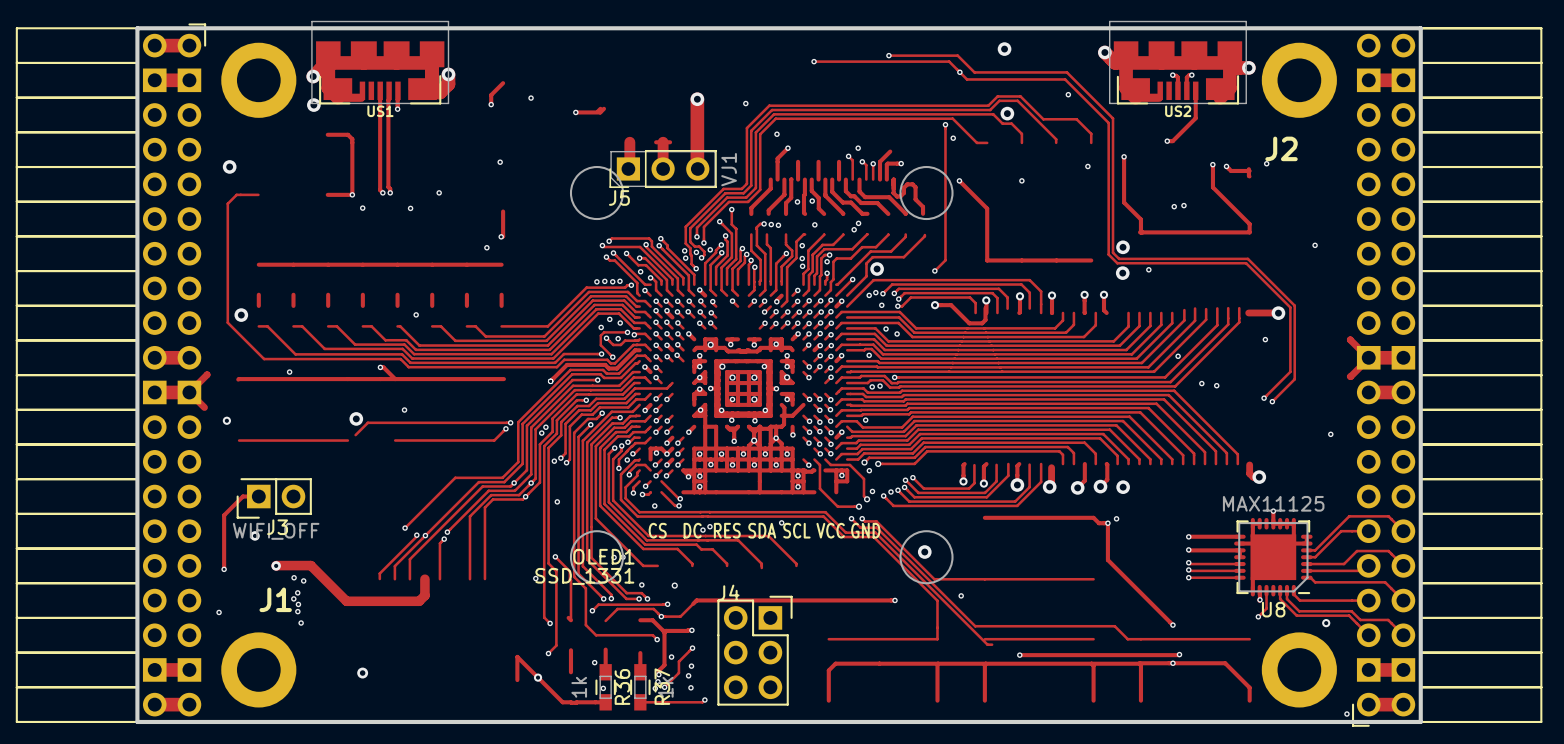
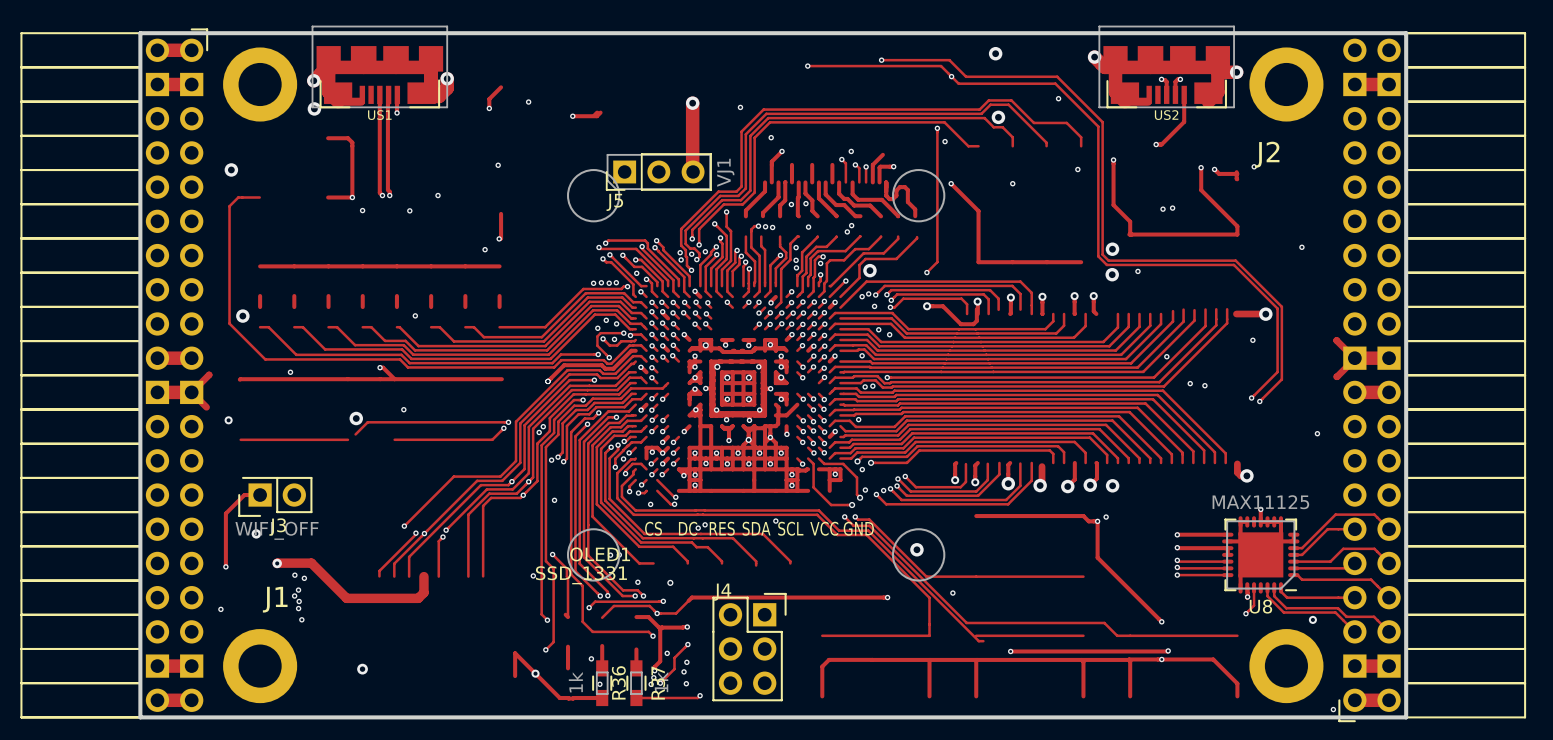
track: (629, 142) (628, 168) -> none
track: (656, 142) (670, 142) -> none
track: (663, 142) (663, 168) -> none

